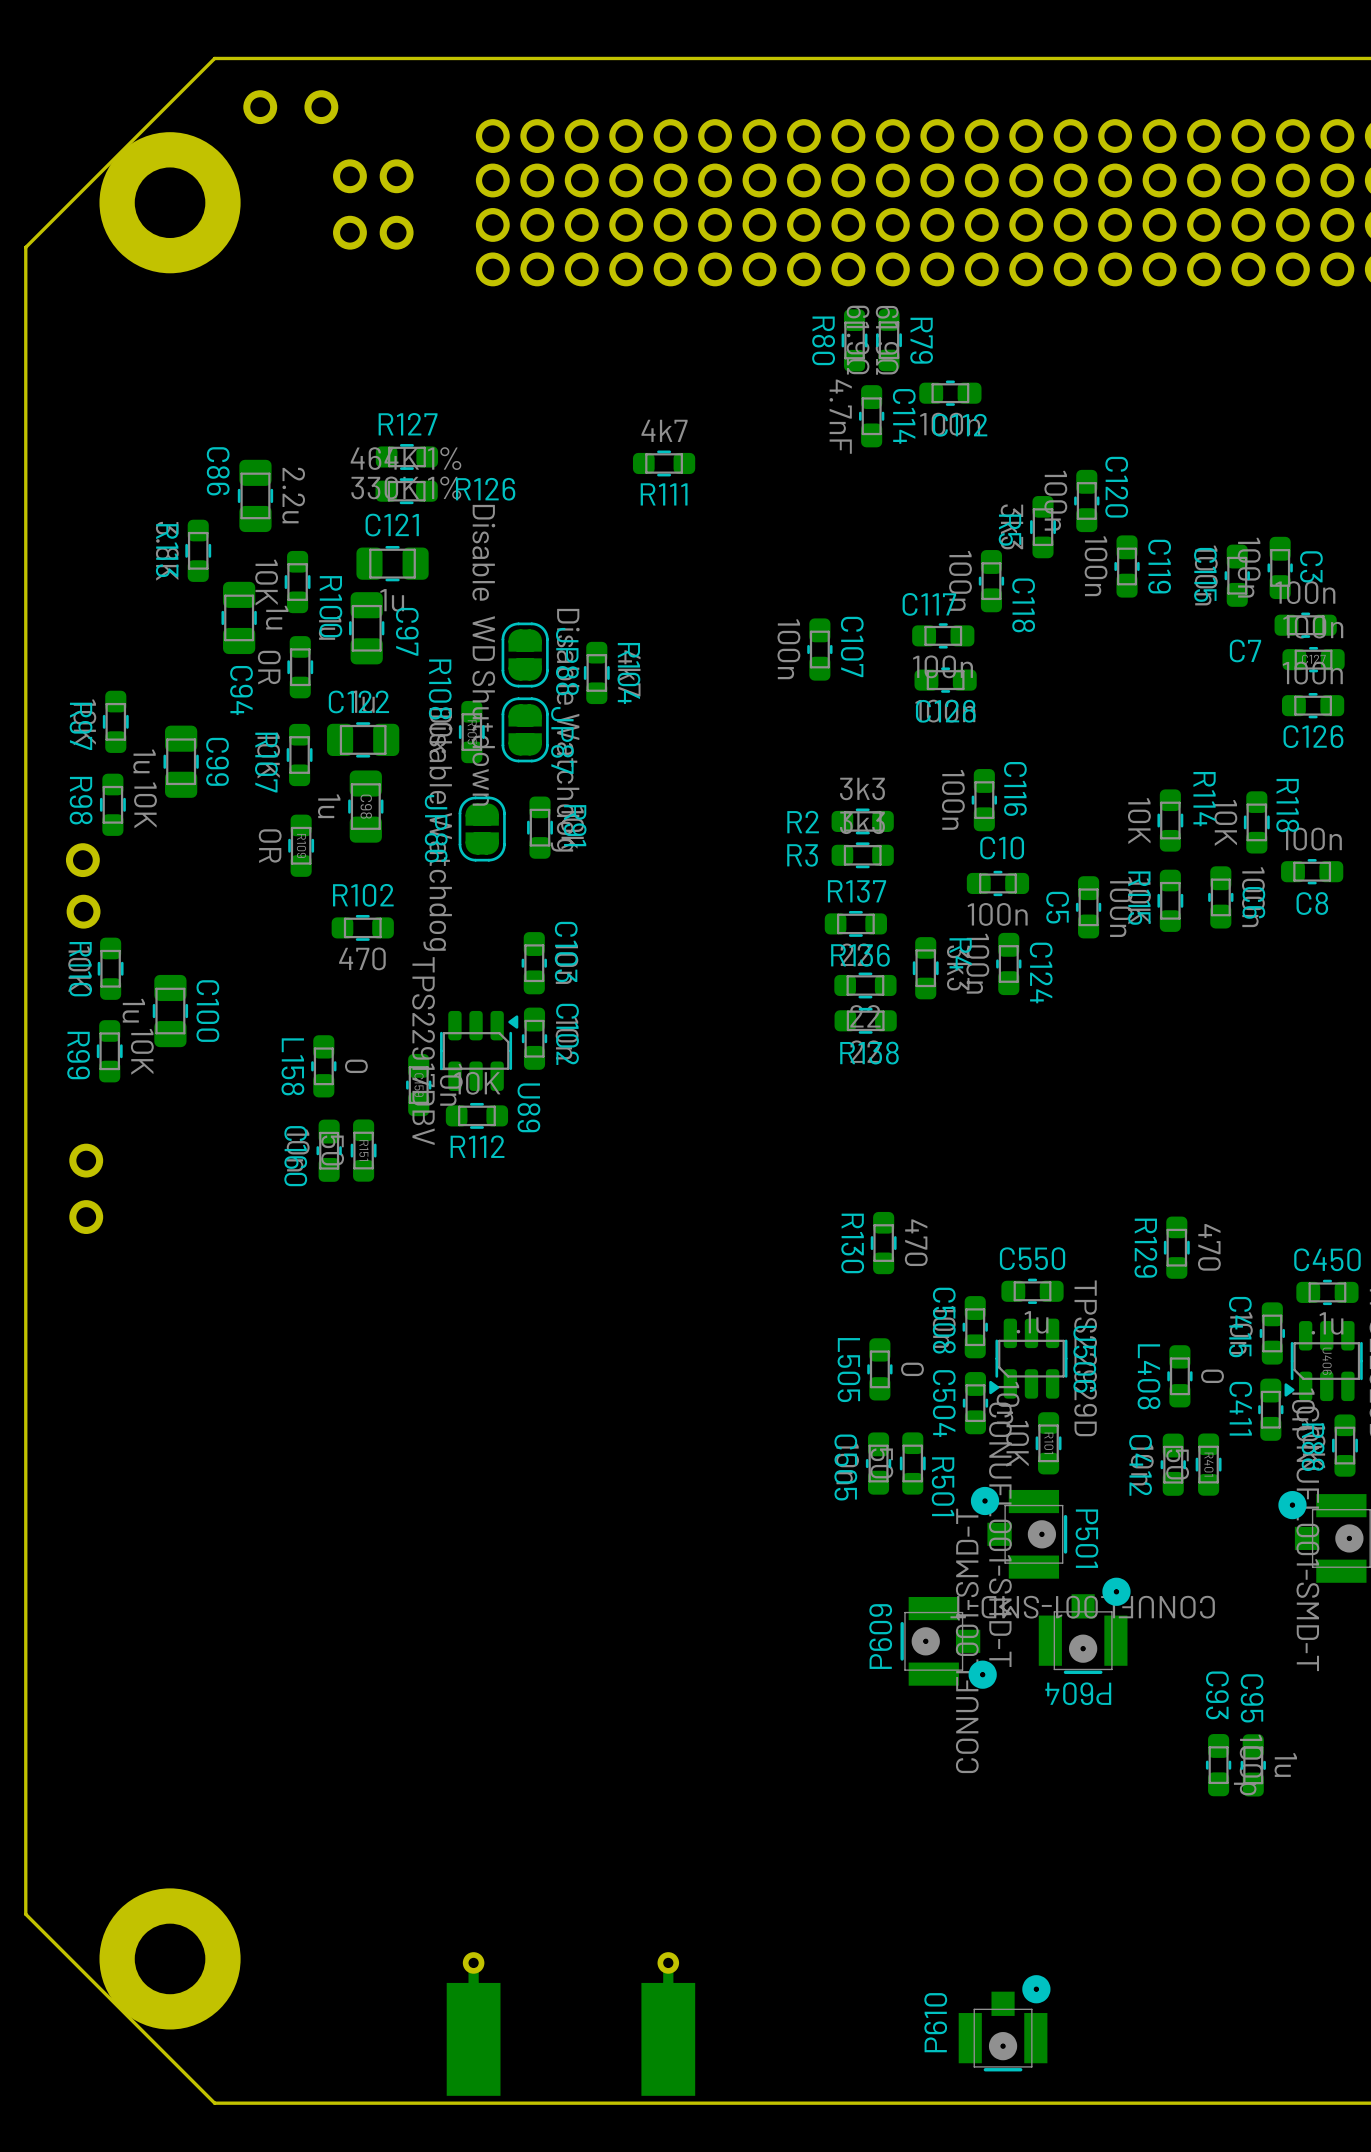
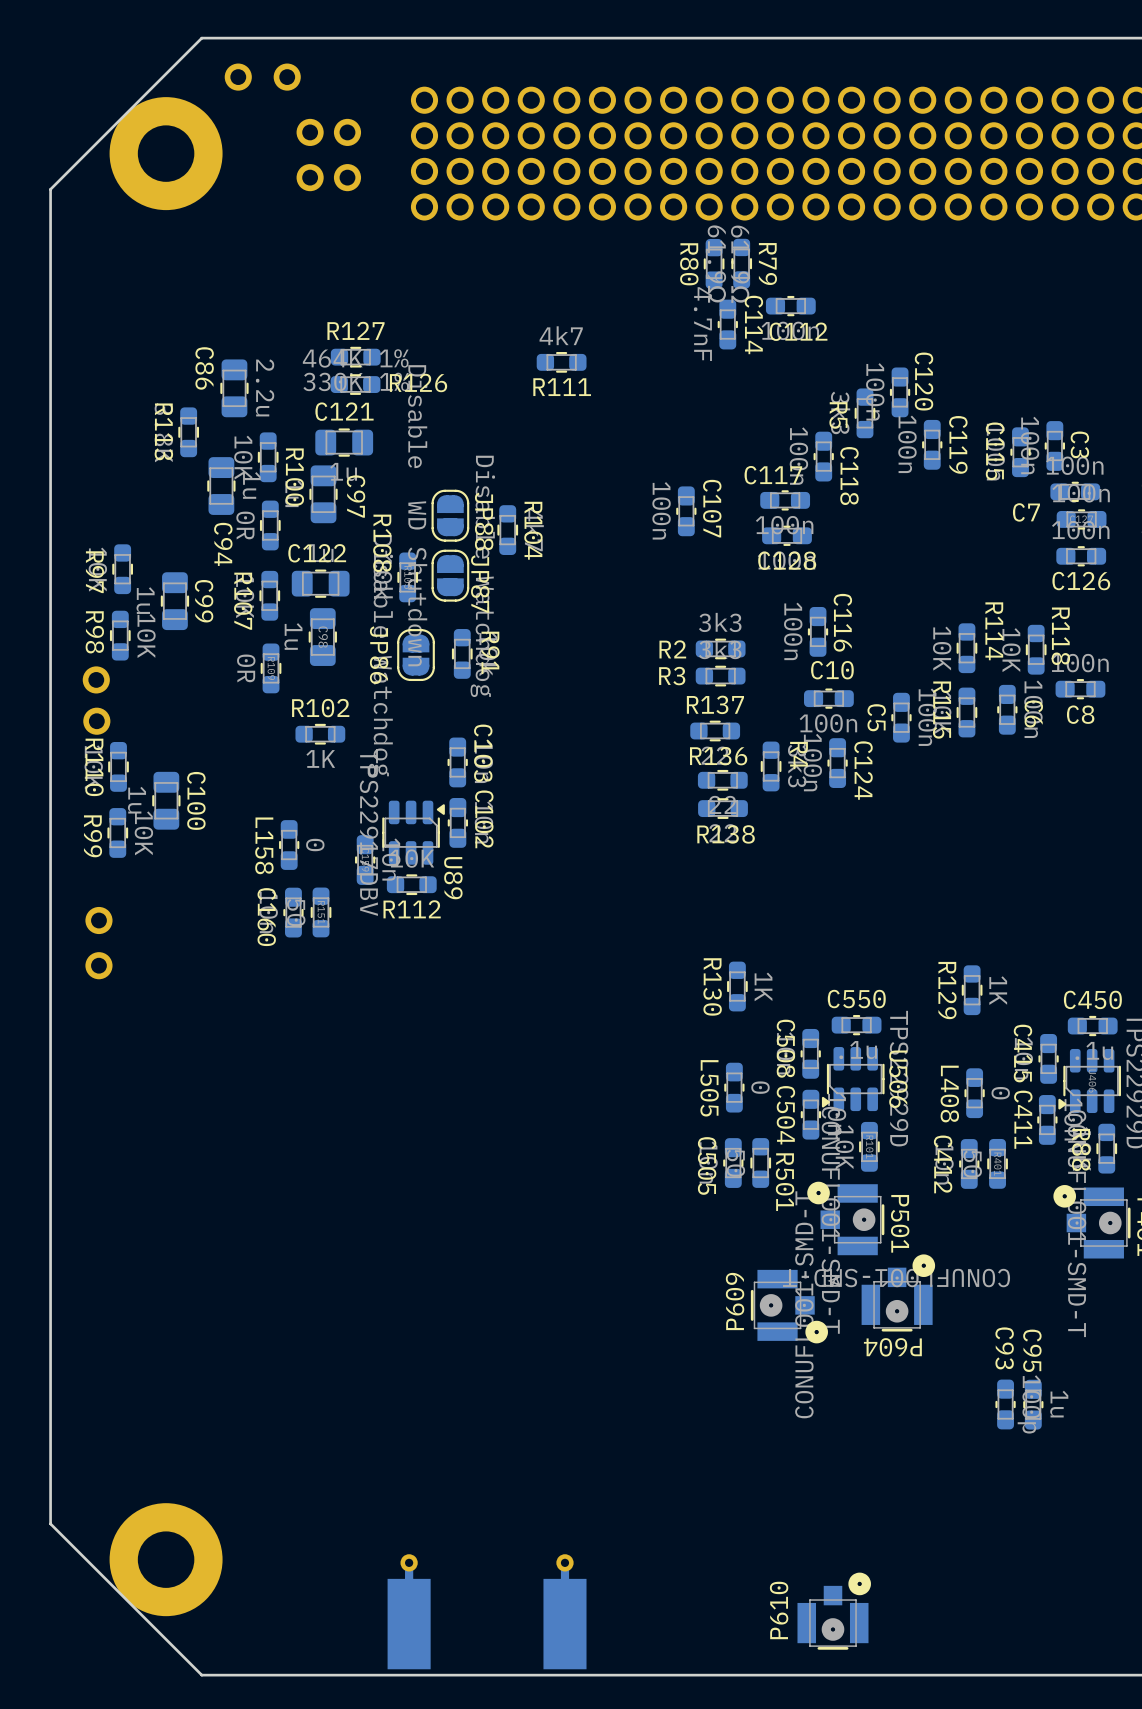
R102 value: 470 (362, 958) -> 1K (320, 758)
R130 value: 470 (916, 1242) -> 1K (763, 986)
R129 value: 470 (1209, 1247) -> 1K (998, 990)

